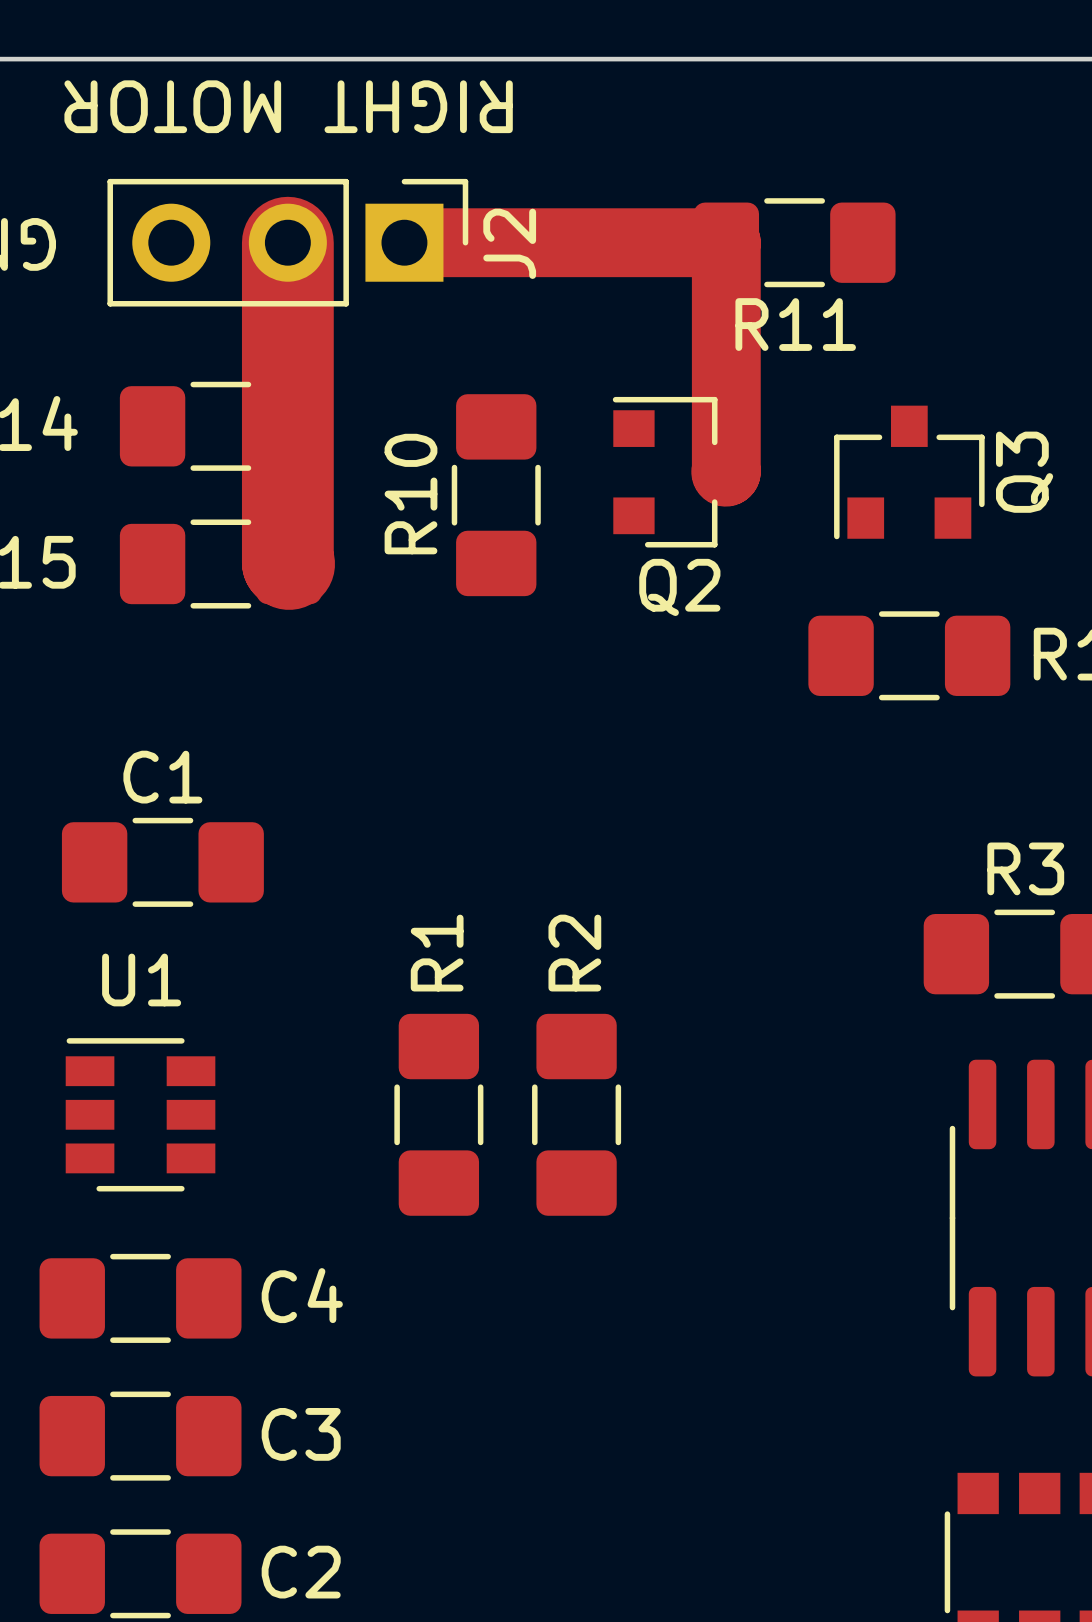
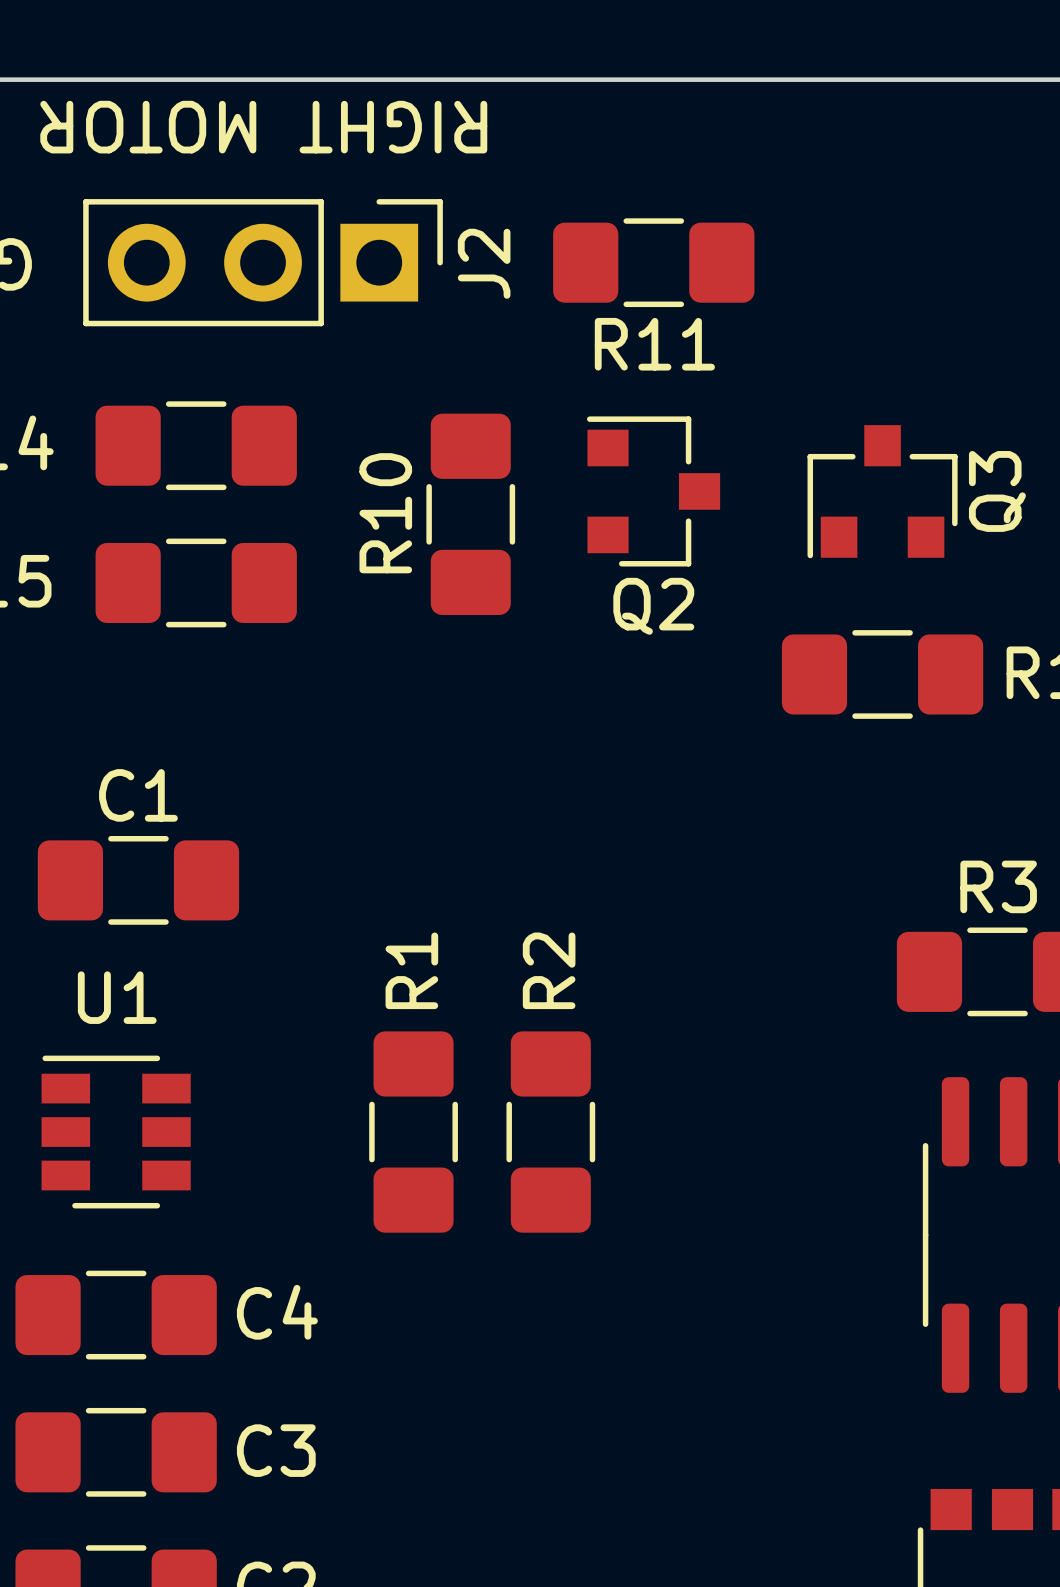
track: (287, 242) (289, 564) -> none
track: (404, 242) (726, 242) (726, 471) -> none
R11 position: (794, 242) -> (653, 262)

